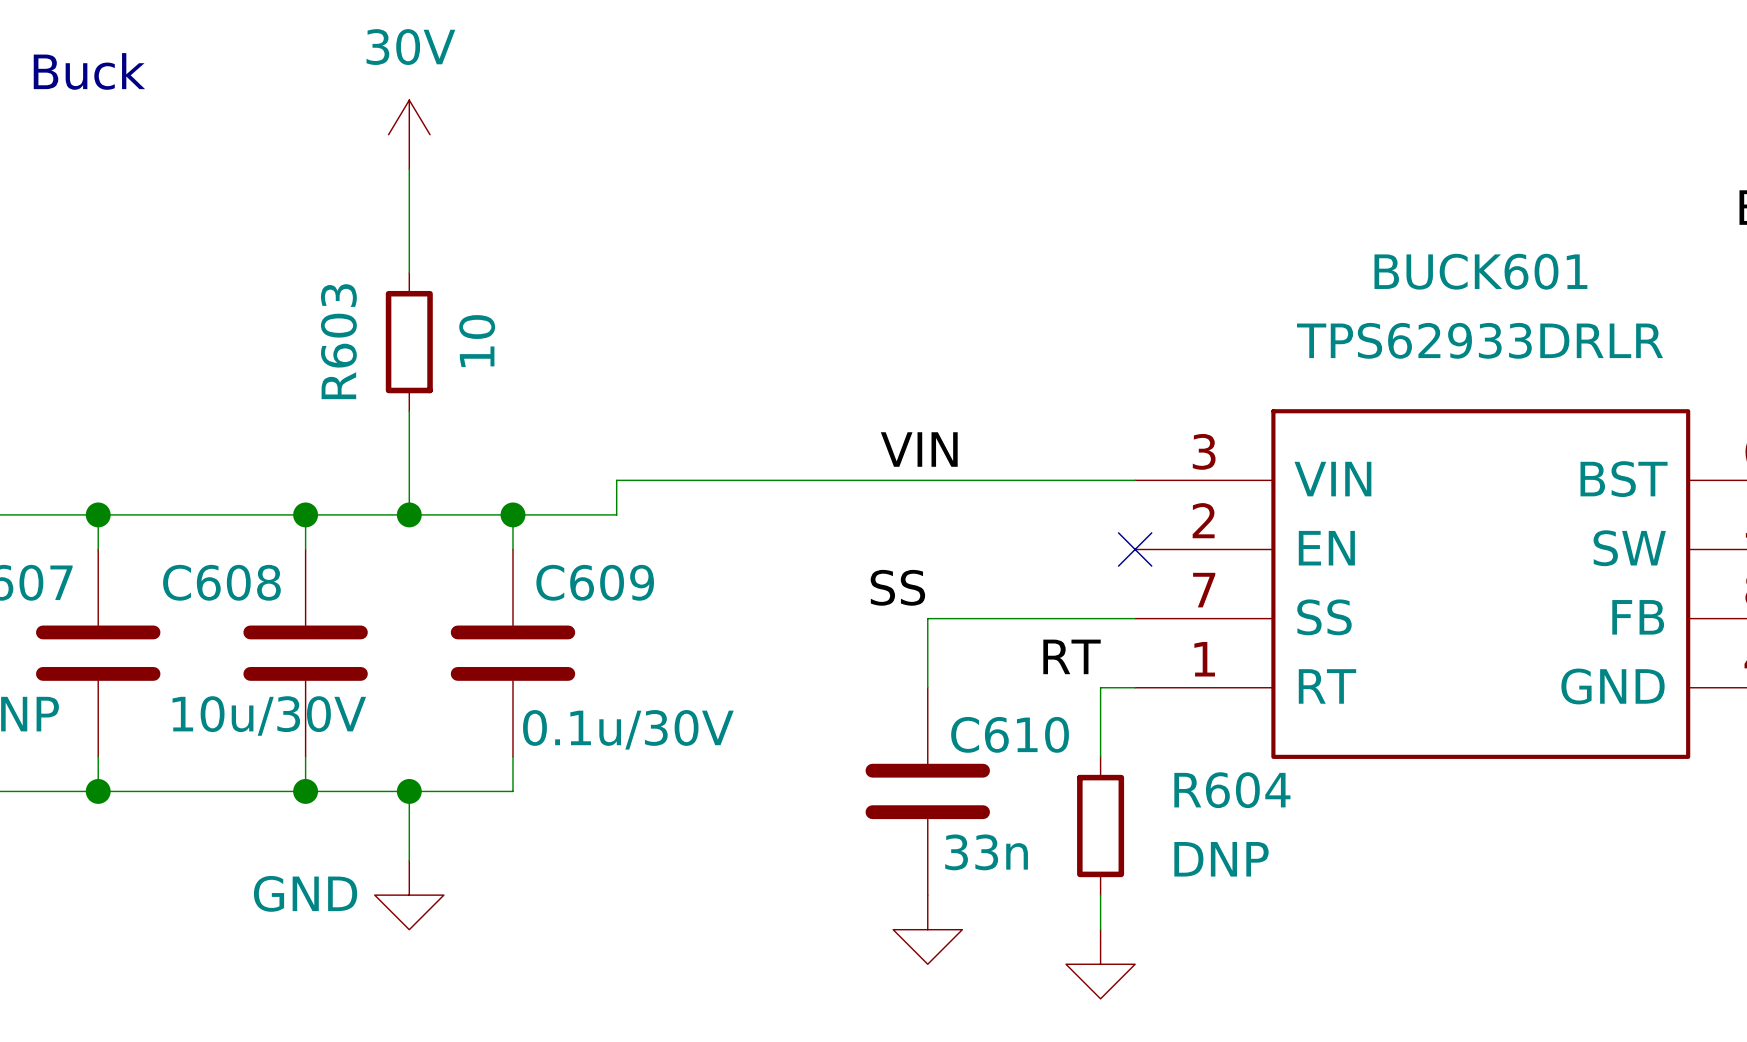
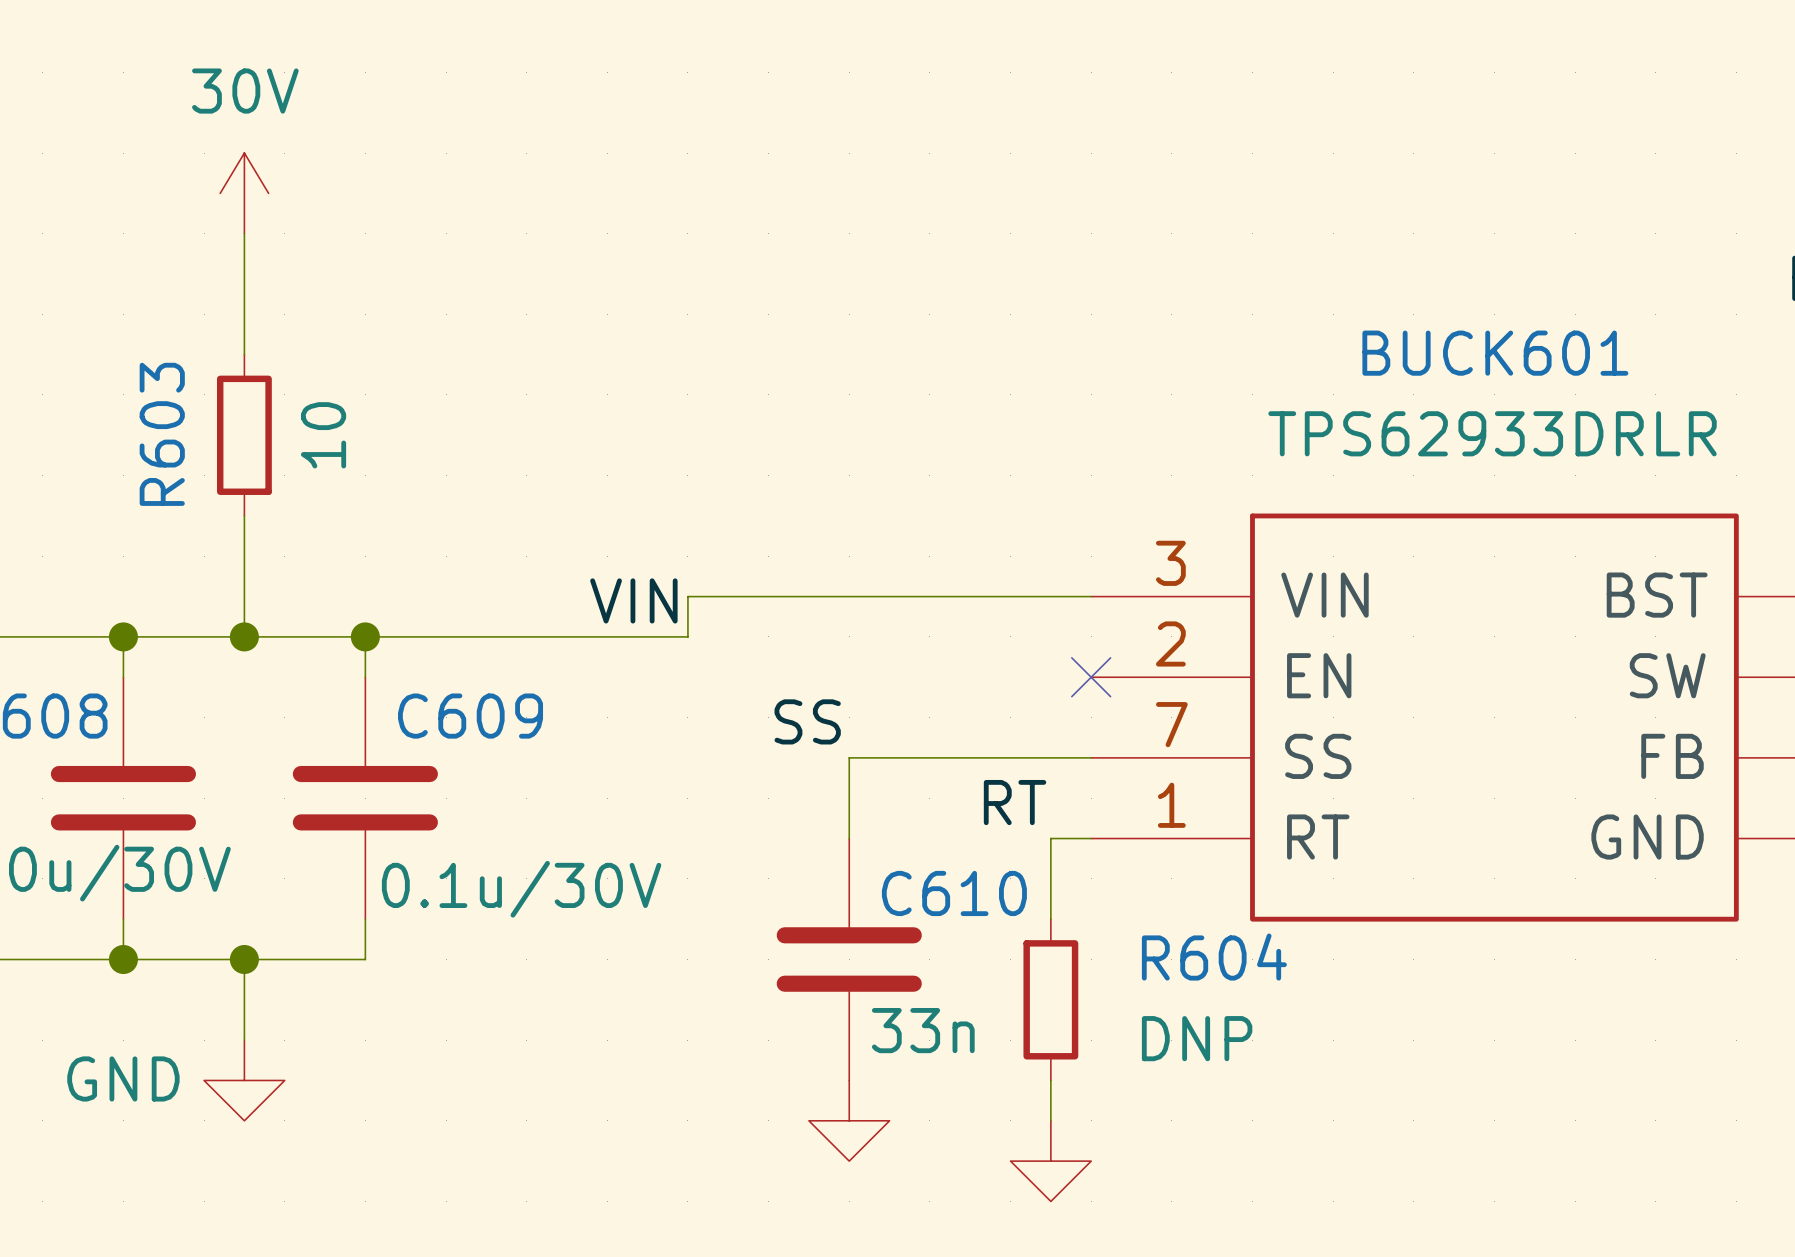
label position: VIN (919, 449) -> VIN (633, 600)
wire: (789, 480) (616, 480) (616, 514) -> (687, 596) (687, 636) (486, 636)

